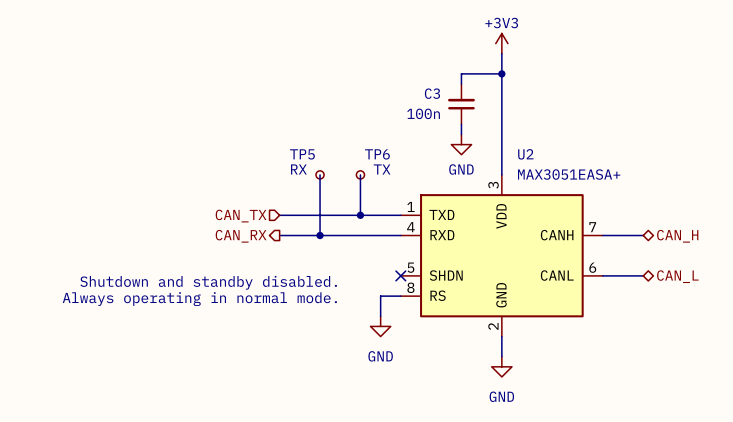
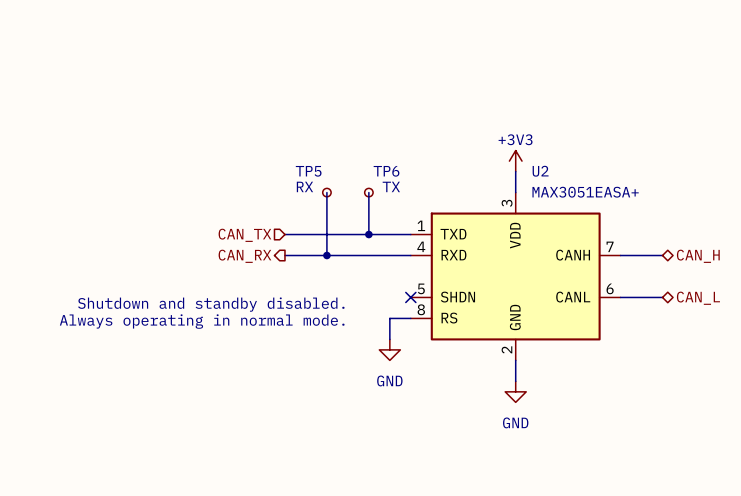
power symbol position: +3V3 (501, 43) -> +3V3 (515, 161)
wire: (501, 53) (501, 154) -> none
wire: (501, 73) (461, 73) (461, 83) -> none
junction: (501, 73) -> none
C3: 100n (461, 104) -> none
wire: (461, 124) (461, 134) -> none
power symbol: GND (461, 144) -> none

